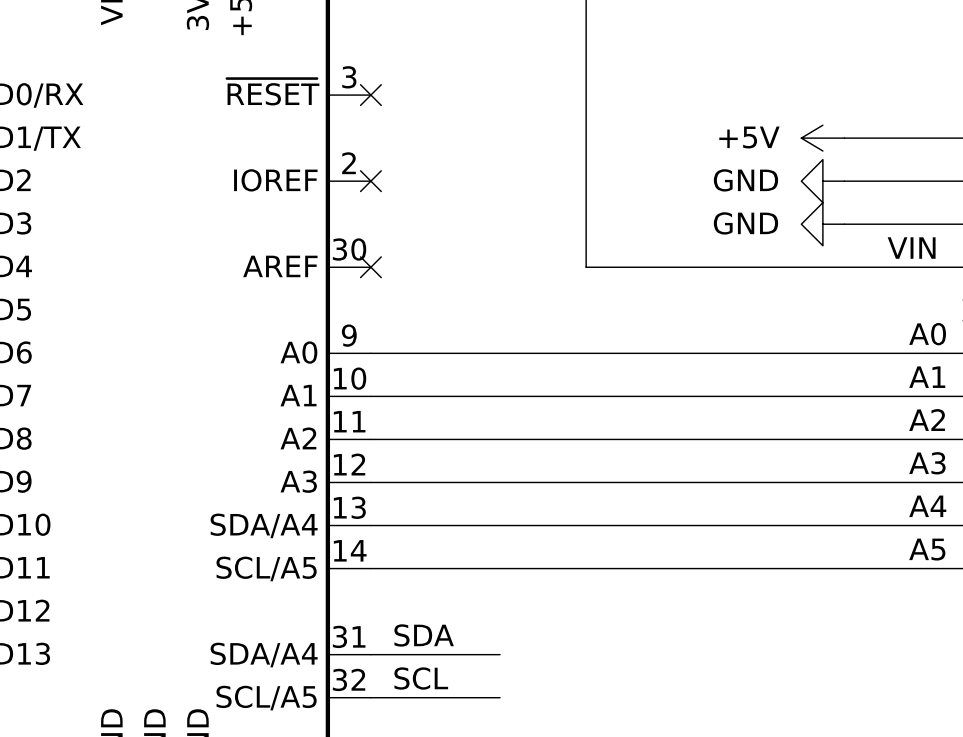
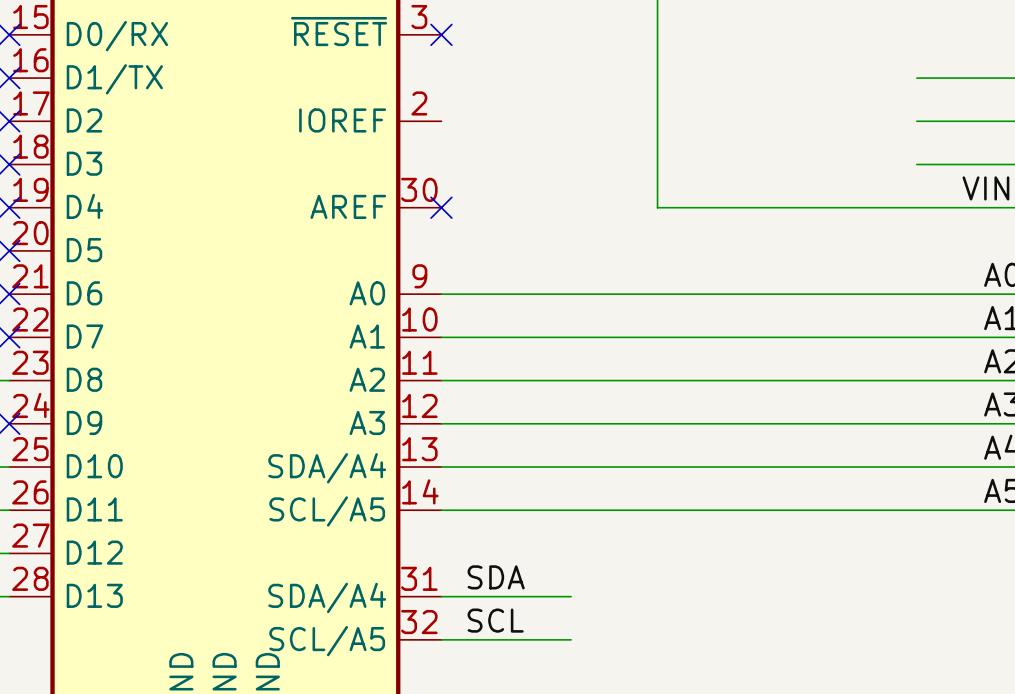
power symbol: +5V (822, 138) -> none
no-connect mark: (370, 181) -> none
power symbol: GND (822, 181) -> none
power symbol: GND (822, 224) -> none

